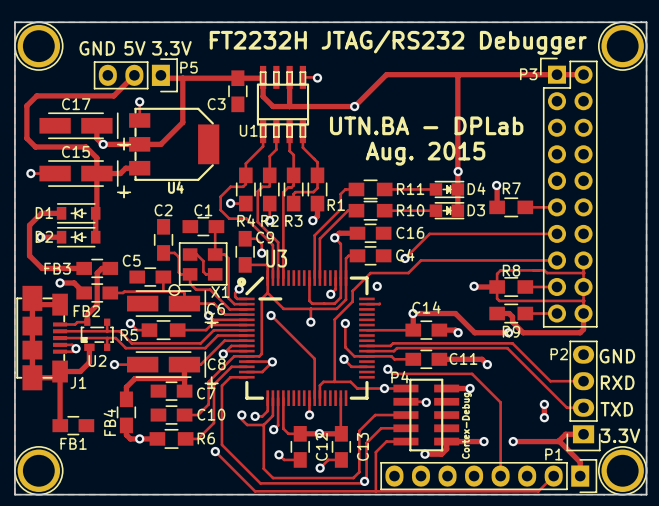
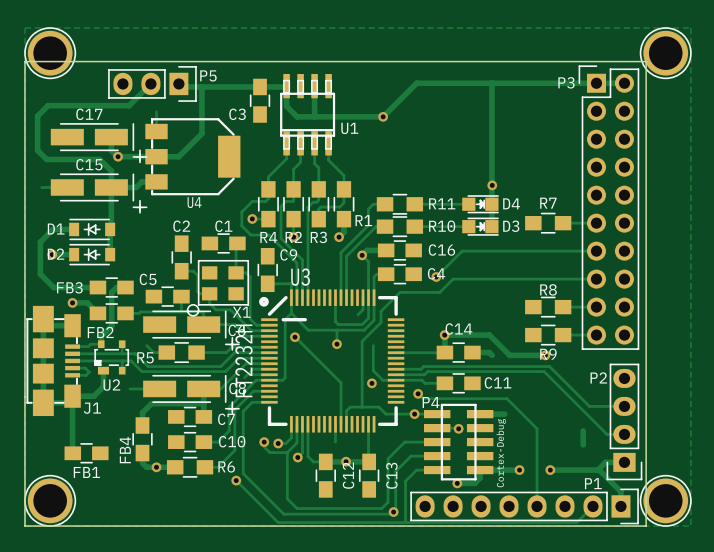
text: FT2232H JTAG/RS232 Debugger (398, 42) -> none
text: GND (97, 48) -> none
text: 5V (134, 48) -> none
text: 3.3V (171, 48) -> none
board edge: (14, 54) (14, 22) (646, 22) (646, 494) (604, 494) -> (24, 61) (646, 61) (646, 526)
track: (302, 77) (317, 78) -> none
via: (317, 78) -> none
via: (139, 101) -> none
text: UTN.BA - DPLab (426, 125) -> none
U1 name position: U1 (248, 130) -> U1 (349, 128)
text: Aug. 2015 (425, 153) -> none
via: (30, 173) -> none
track: (496, 185) (497, 207) -> none
via: (496, 185) -> none
track: (245, 238) (256, 238) (261, 243) (261, 253) -> none
via: (261, 253) -> none
track: (190, 254) (196, 254) (203, 261) (203, 271) (206, 274) (215, 274) -> none
track: (583, 260) (583, 329) (580, 332) (523, 332) (512, 322) (512, 316) (509, 313) (497, 313) -> none
track: (584, 273) (500, 270) (497, 273) (497, 298) (499, 300) (584, 300) -> none
via: (377, 286) -> none
track: (474, 286) (497, 286) -> none
via: (474, 286) -> none
track: (239, 288) (235, 292) (235, 296) (237, 298) (246, 298) -> none
via: (239, 288) -> none
via: (330, 294) -> none
track: (379, 303) (366, 304) -> none
track: (208, 315) (213, 319) (246, 319) -> none
via: (208, 315) -> none
via: (130, 323) -> none
via: (345, 323) -> none
via: (458, 332) -> none
U3 value: none -> FT2232H (244, 360)
via: (75, 348) -> none
via: (223, 354) -> none
text: GND (617, 356) -> none
track: (344, 359) (351, 366) (366, 366) -> none
track: (439, 359) (482, 359) (487, 364) -> none
track: (246, 361) (272, 361) (262, 372) (246, 372) -> none
via: (272, 361) -> none
via: (114, 364) -> none
via: (487, 364) -> none
text: RXD (617, 382) -> none
via: (470, 388) -> none
via: (544, 404) -> none
text: TXD (616, 409) -> none
via: (309, 415) -> none
via: (544, 417) -> none
text: 3.3V (620, 435) -> none
track: (279, 454) (284, 459) (300, 459) -> none
via: (279, 454) -> none
track: (341, 459) (328, 459) (320, 468) -> none
via: (320, 468) -> none

